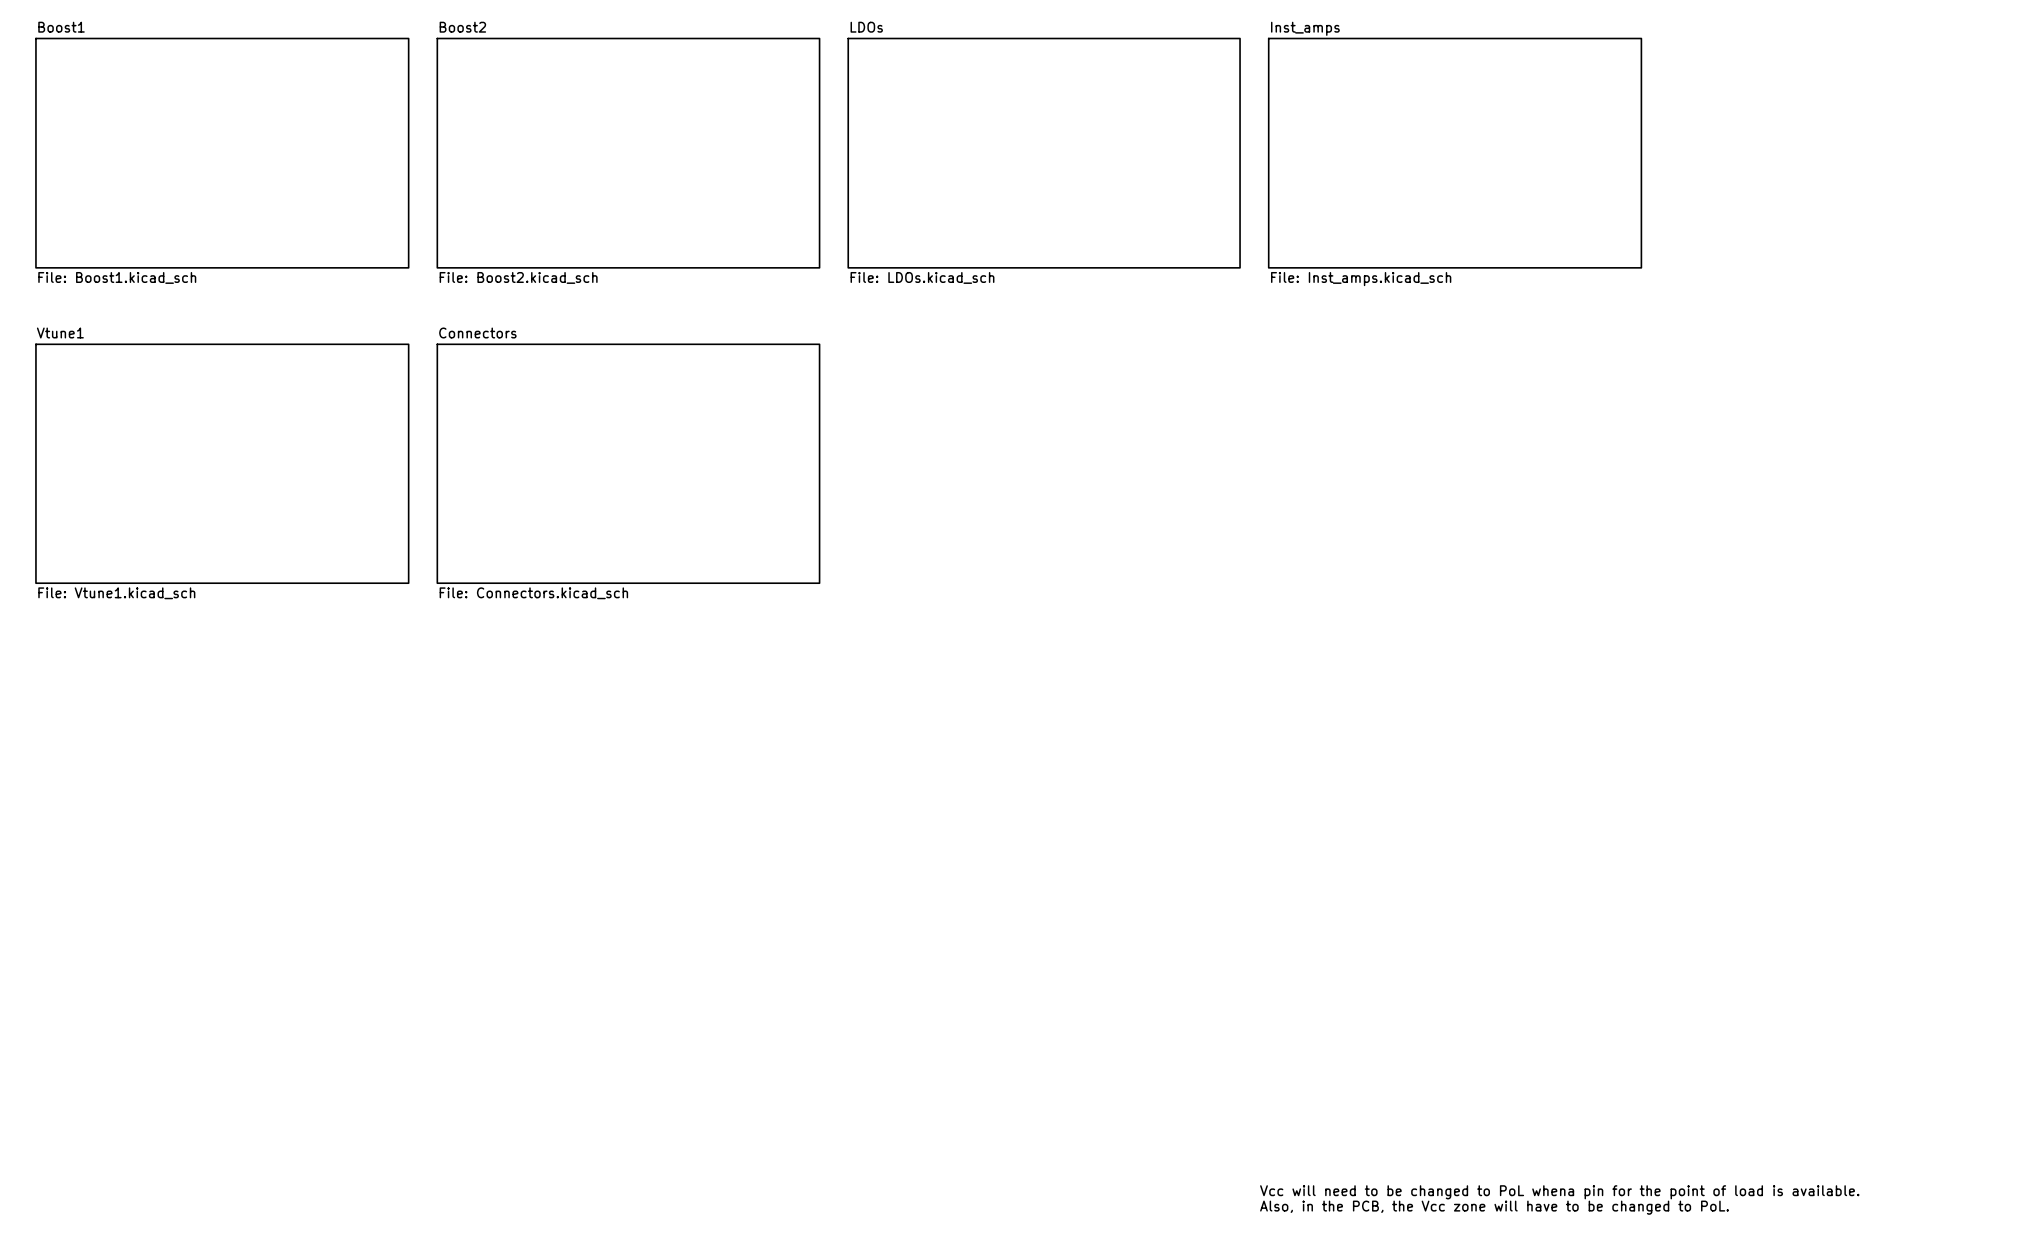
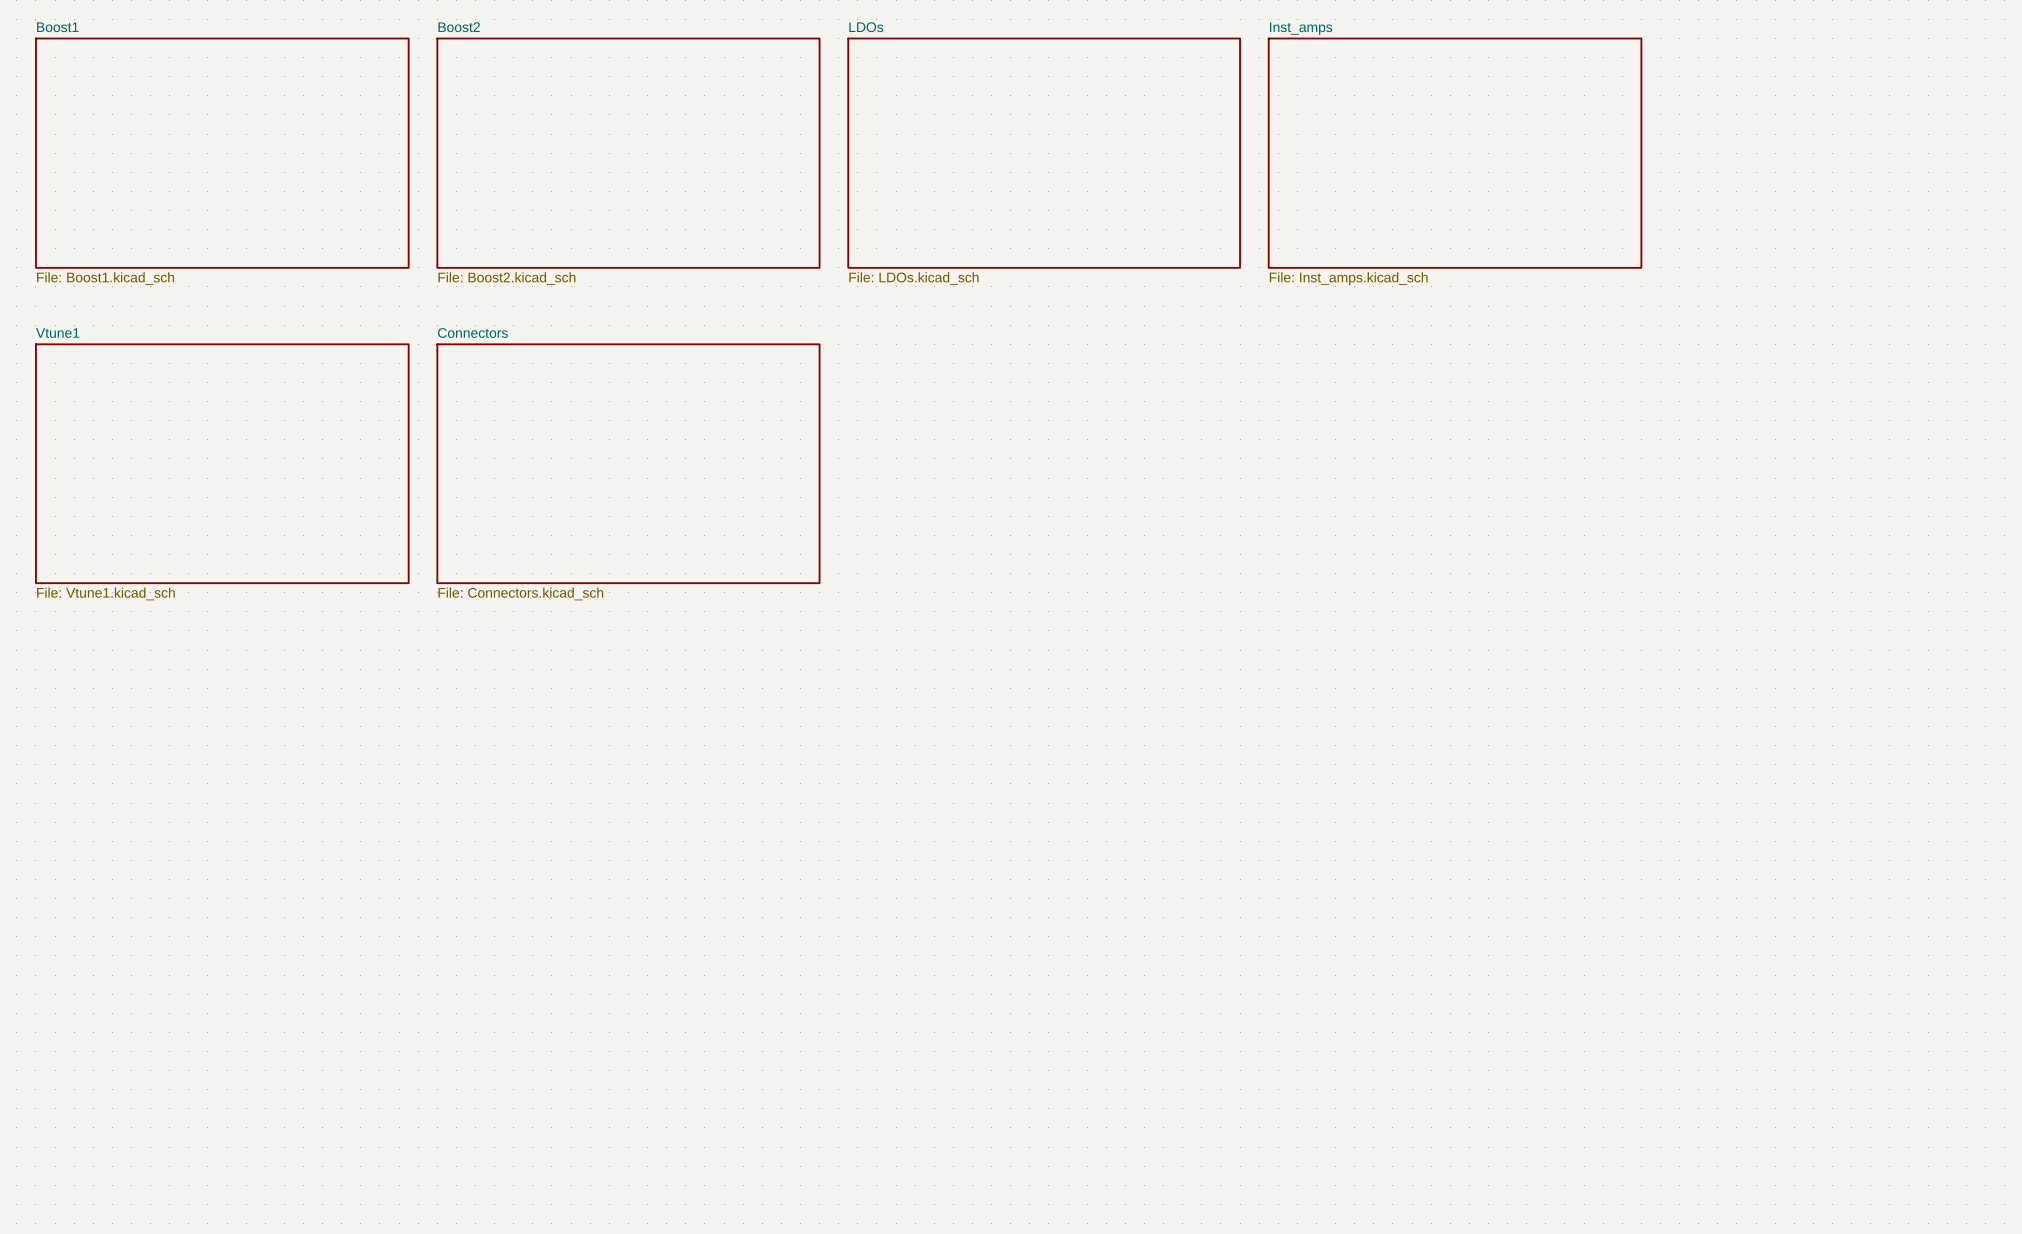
text: Vcc will need to be changed to PoL whena pin for the point of load is available. (1559, 1192) -> none
text: Also, in the PCB, the Vcc zone will have to be changed to PoL. (1494, 1207) -> none

